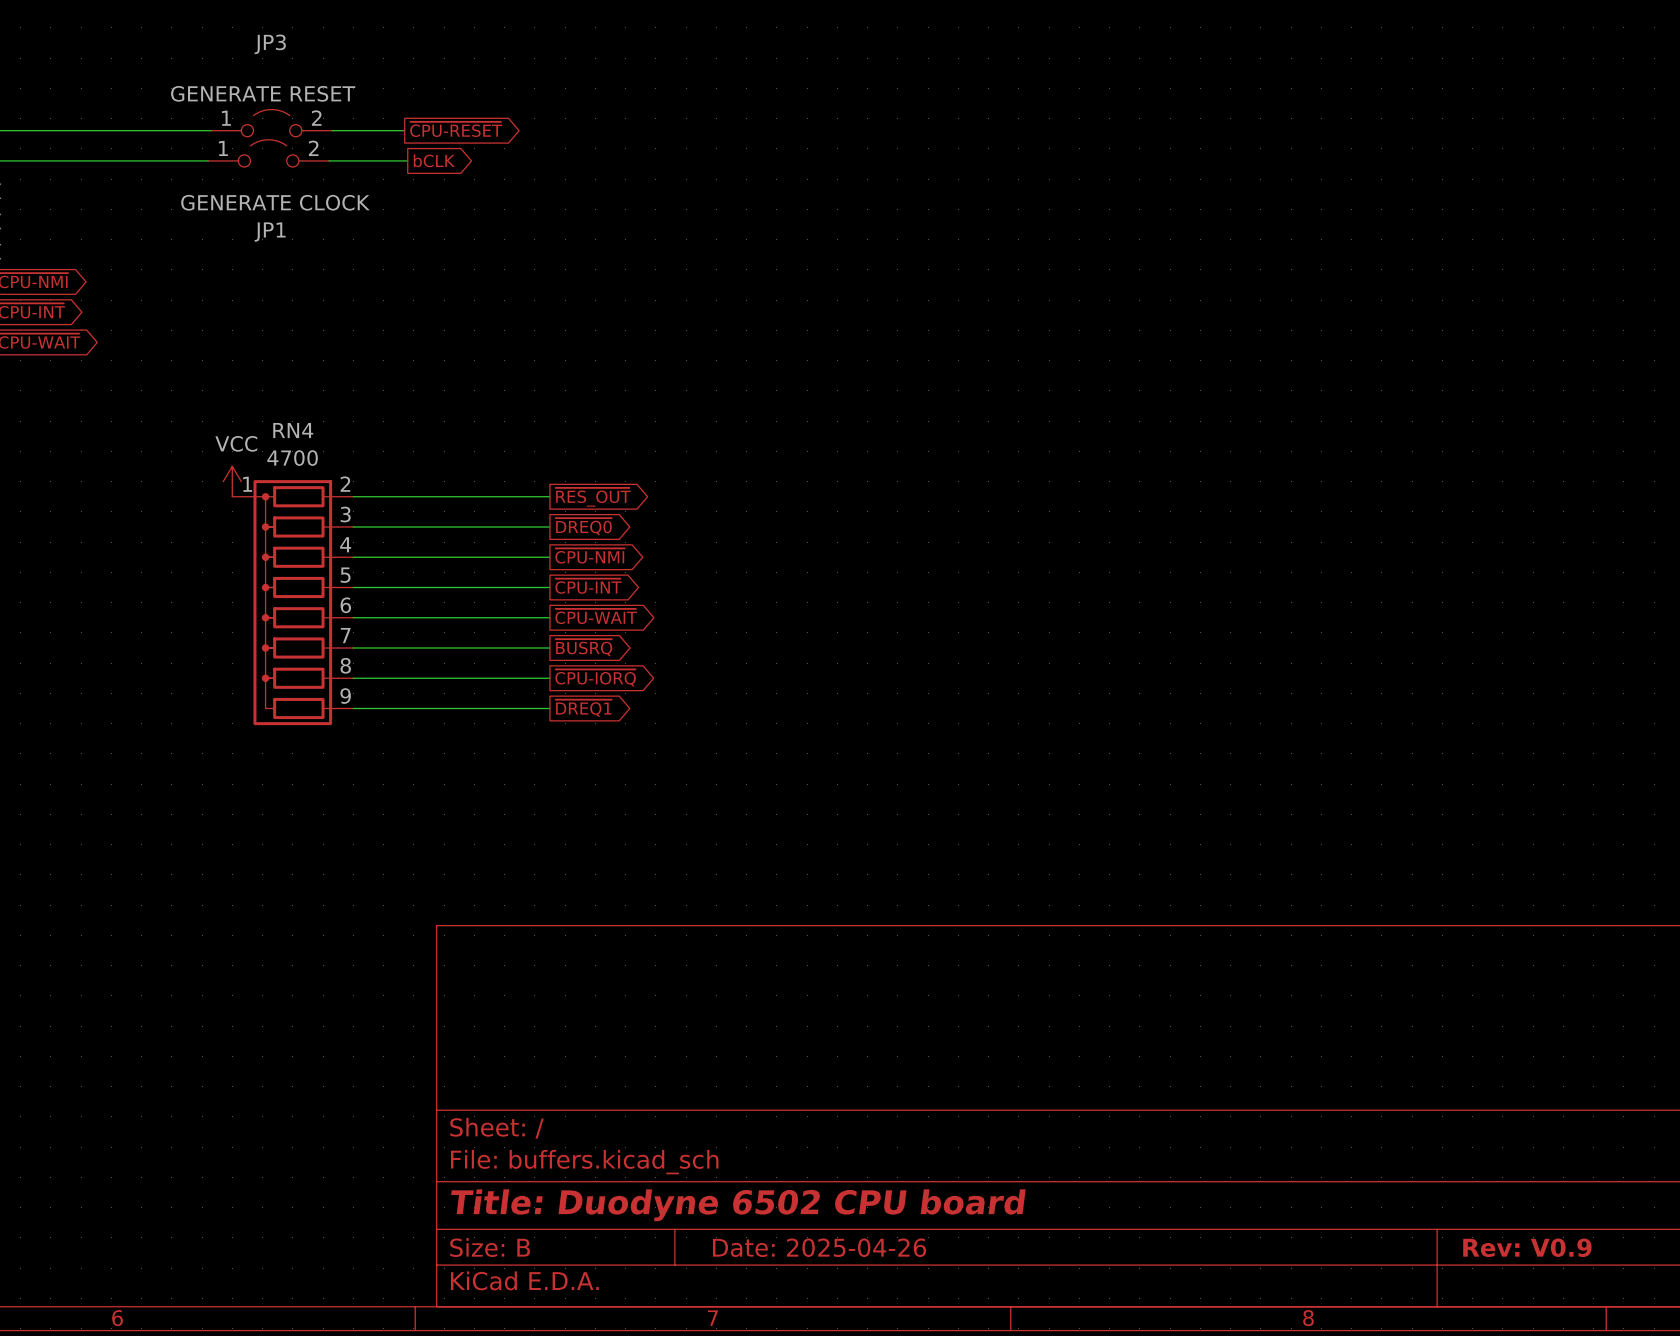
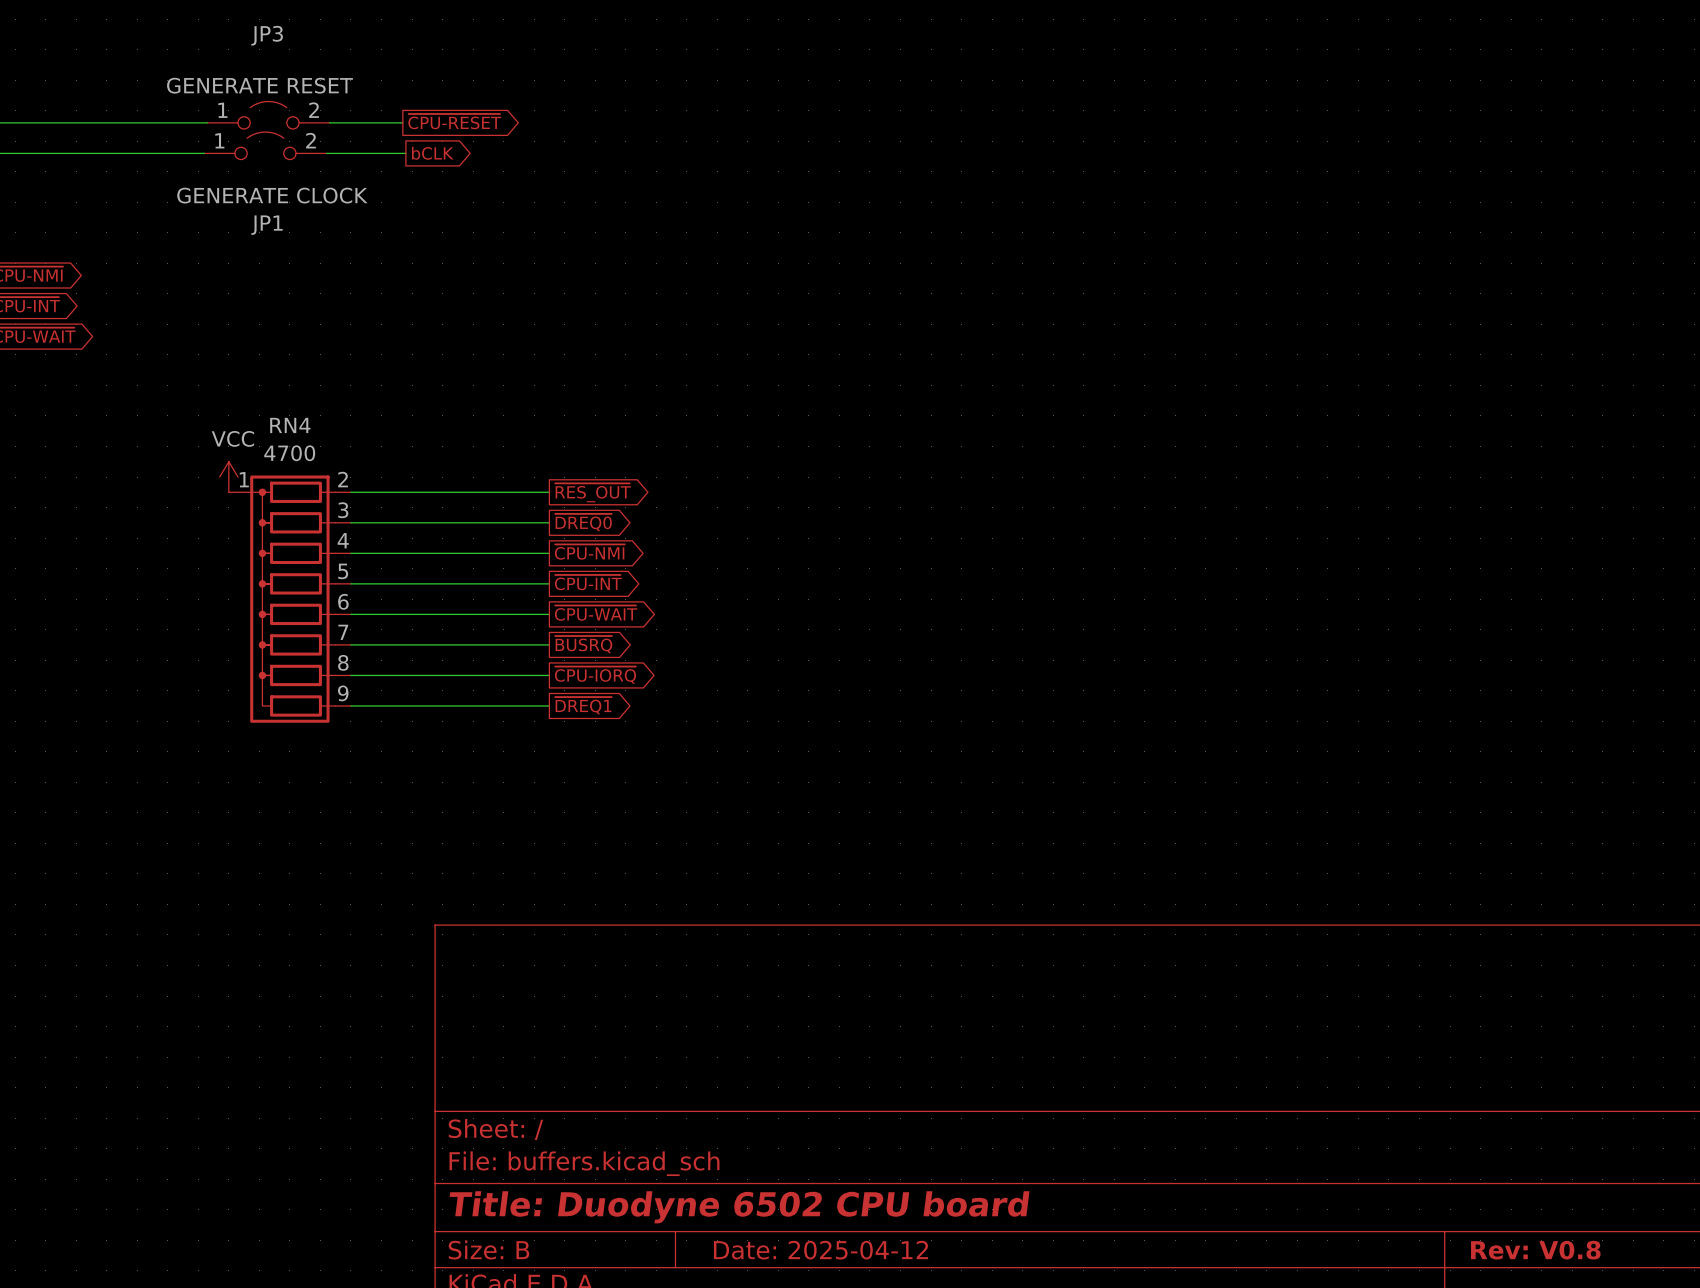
title block: Date: 2025-04-26 (819, 1247) -> Date: 2025-04-12 (821, 1250)
title block: Rev: V0.9 (1527, 1247) -> Rev: V0.8 (1535, 1250)

